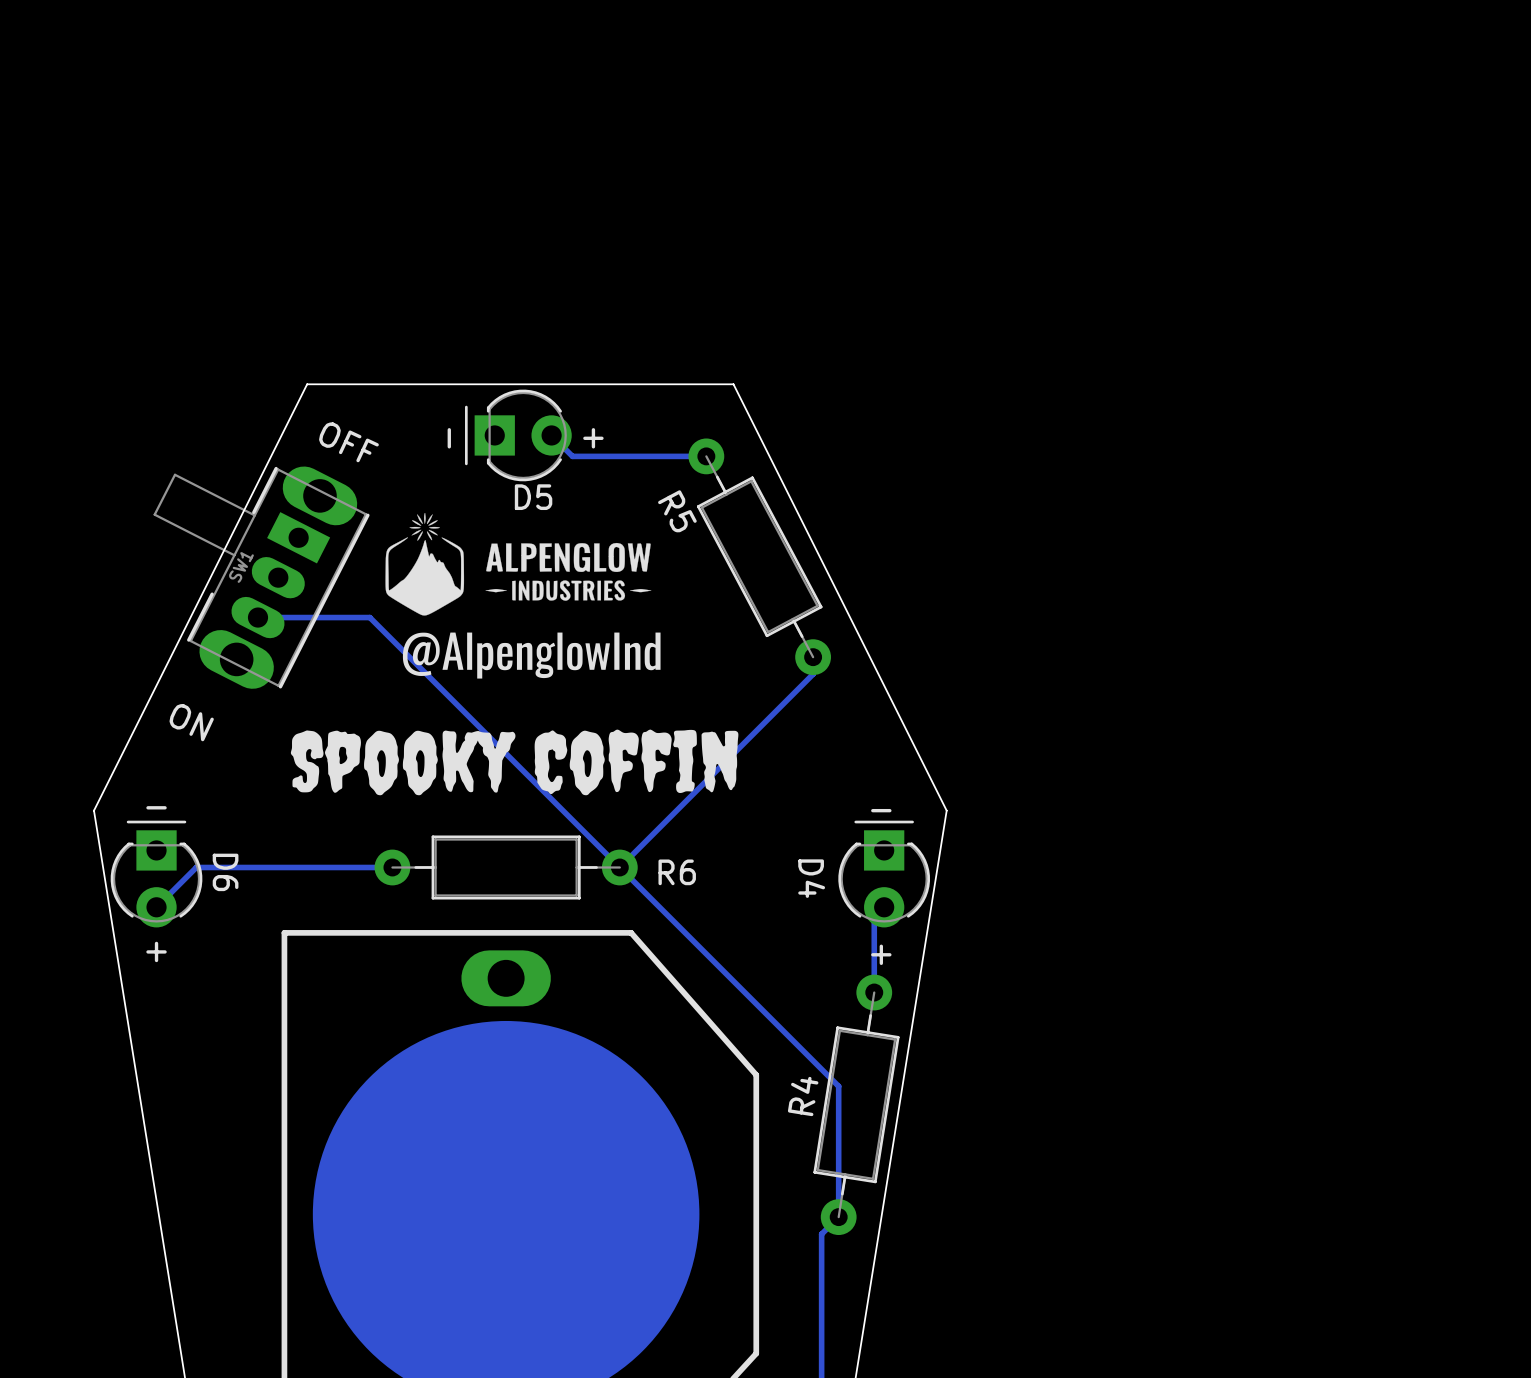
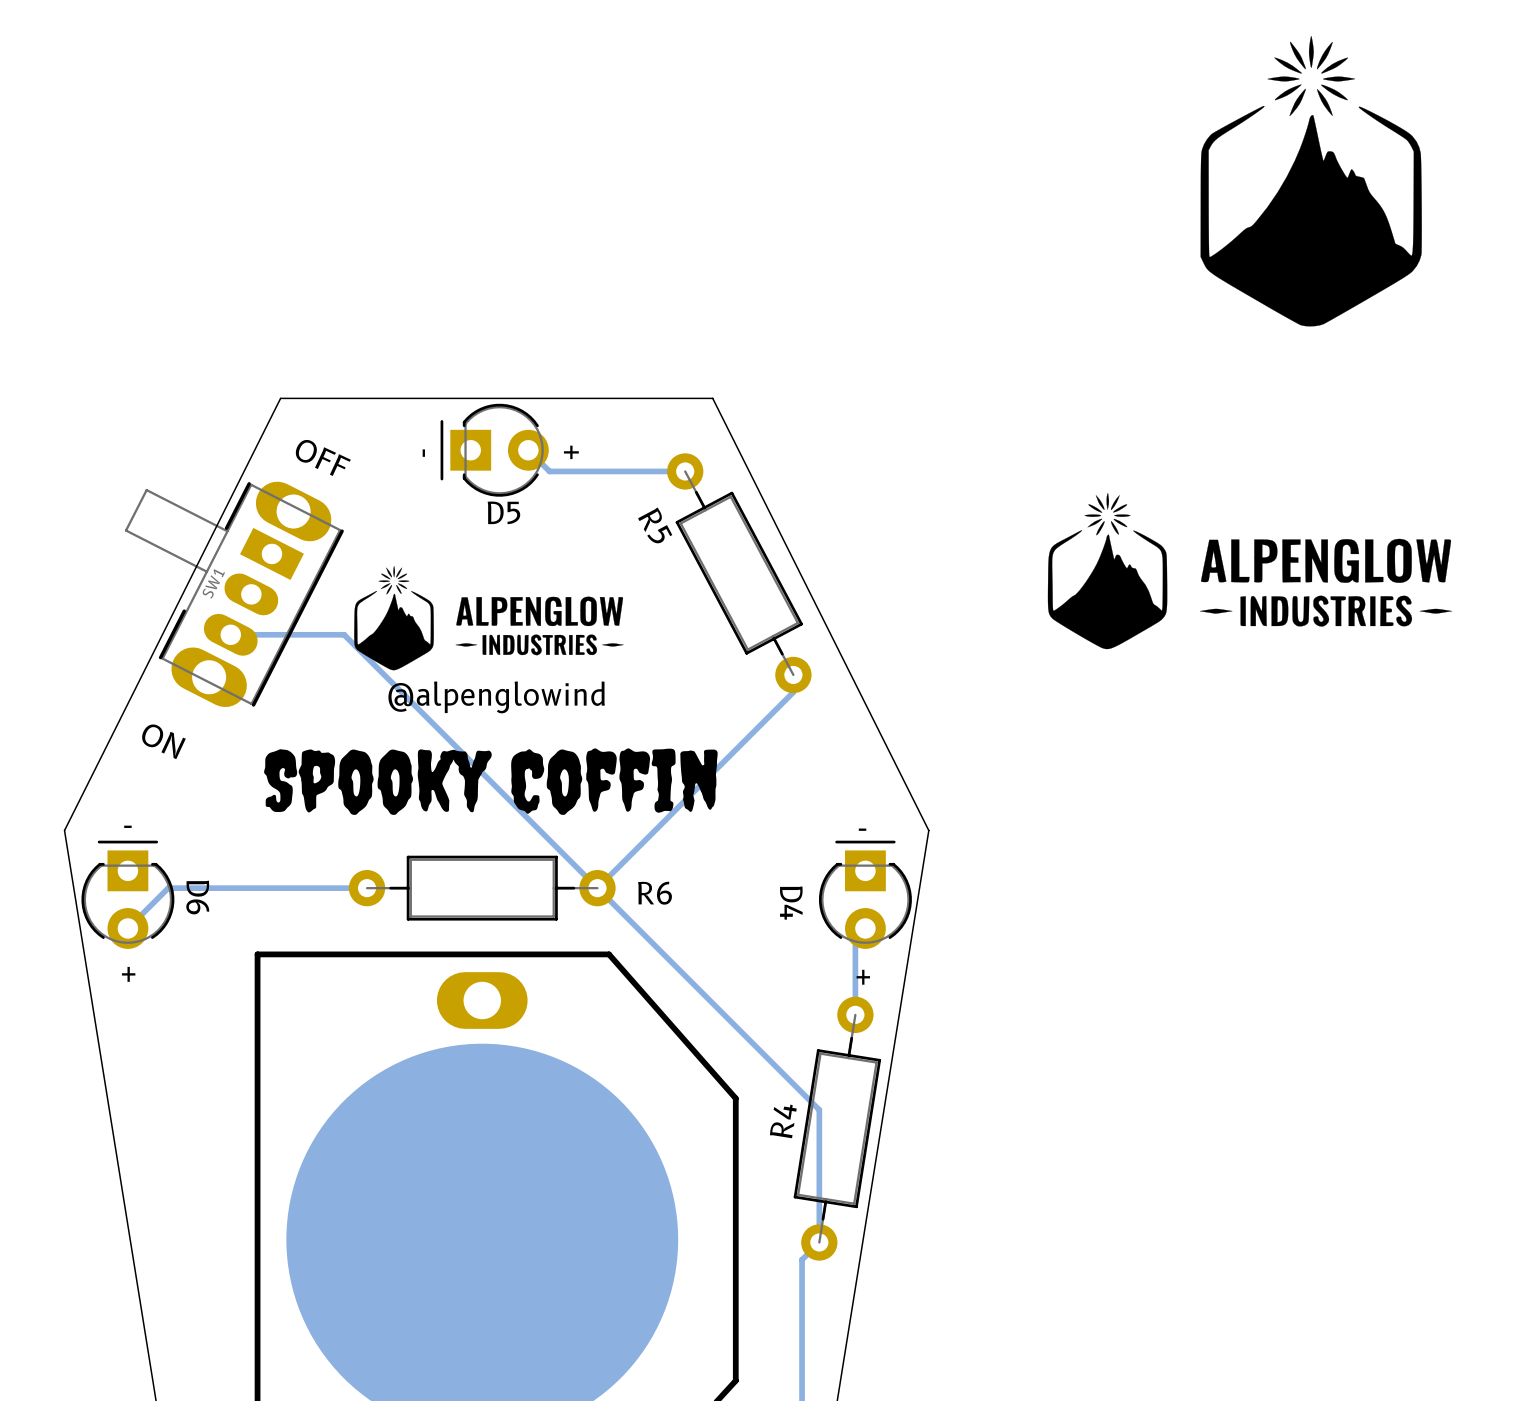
drawing: none -> [1200, 36, 1422, 327]
drawing: none -> [1047, 493, 1453, 650]
drawing position: (518, 564) -> (488, 618)
drawing: [402, 632, 661, 679] -> none
text: none -> @alpenglowind (496, 697)

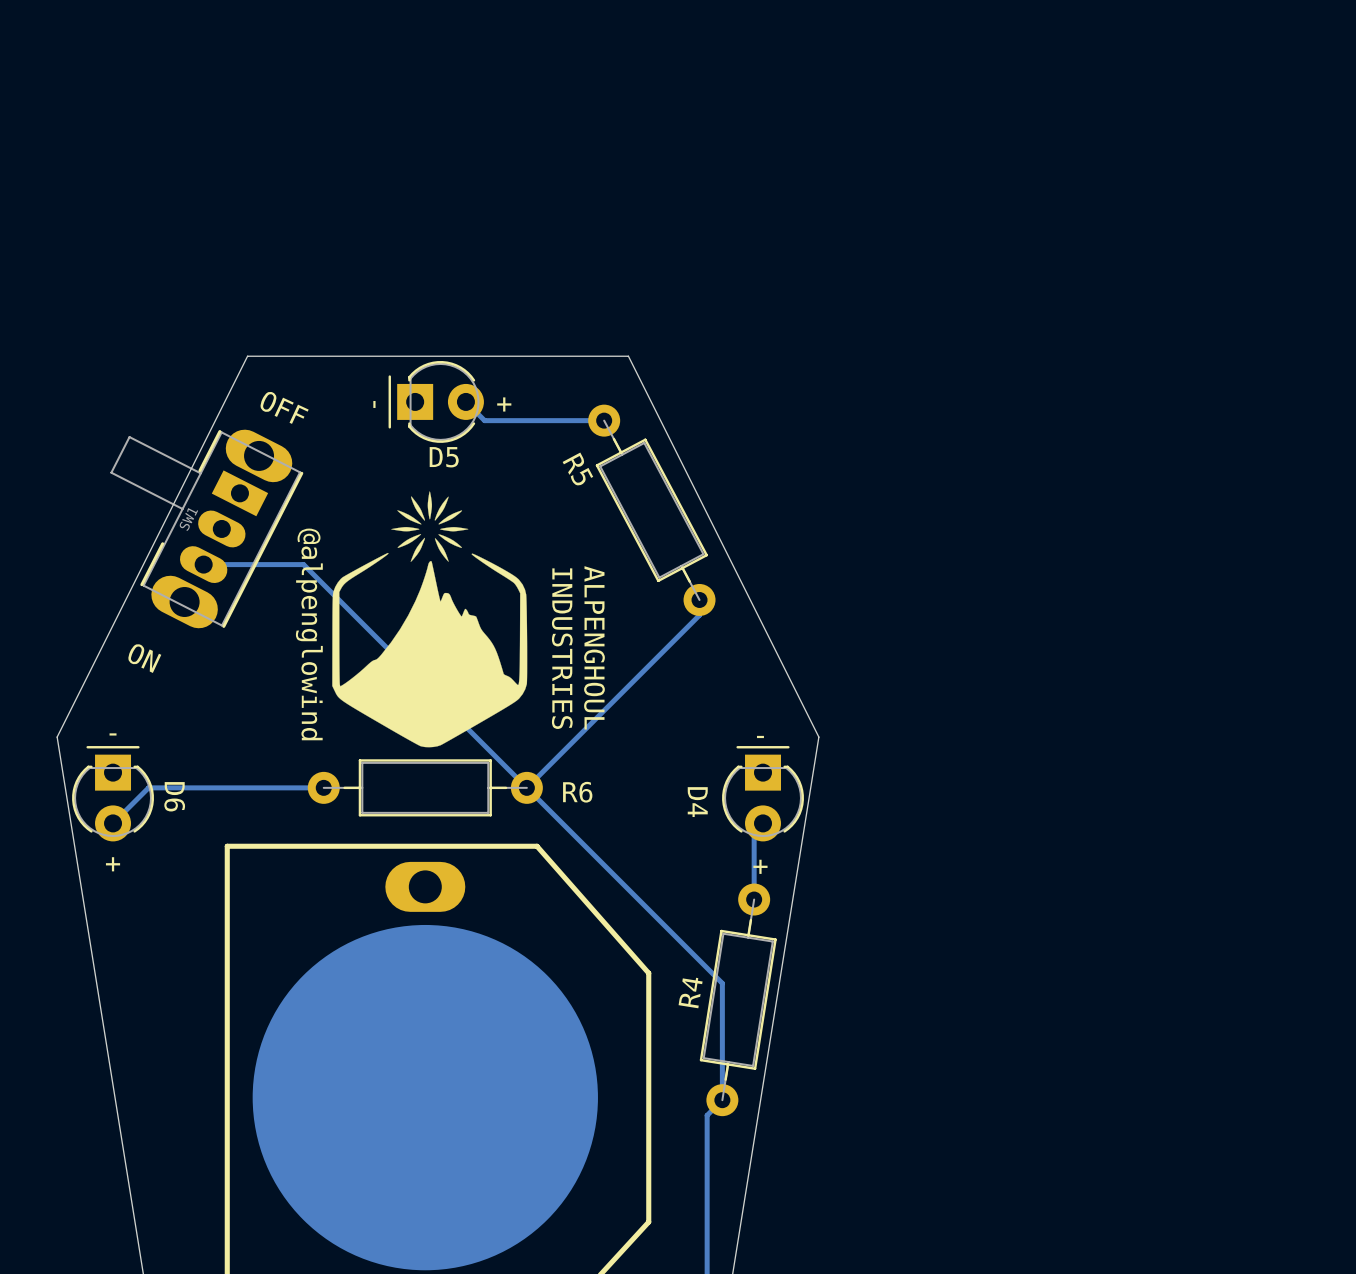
drawing: [1200, 36, 1422, 327] -> none
drawing: [1047, 493, 1453, 650] -> none
drawing: none -> [332, 491, 528, 748]
drawing: [354, 566, 624, 671] -> none
text rotation: 0° (496, 697) -> 90° clockwise (309, 634)
text: none -> ALPENGHOUL (594, 647)
text: none -> INDUSTRIES (562, 648)
drawing: [264, 748, 718, 815] -> none

